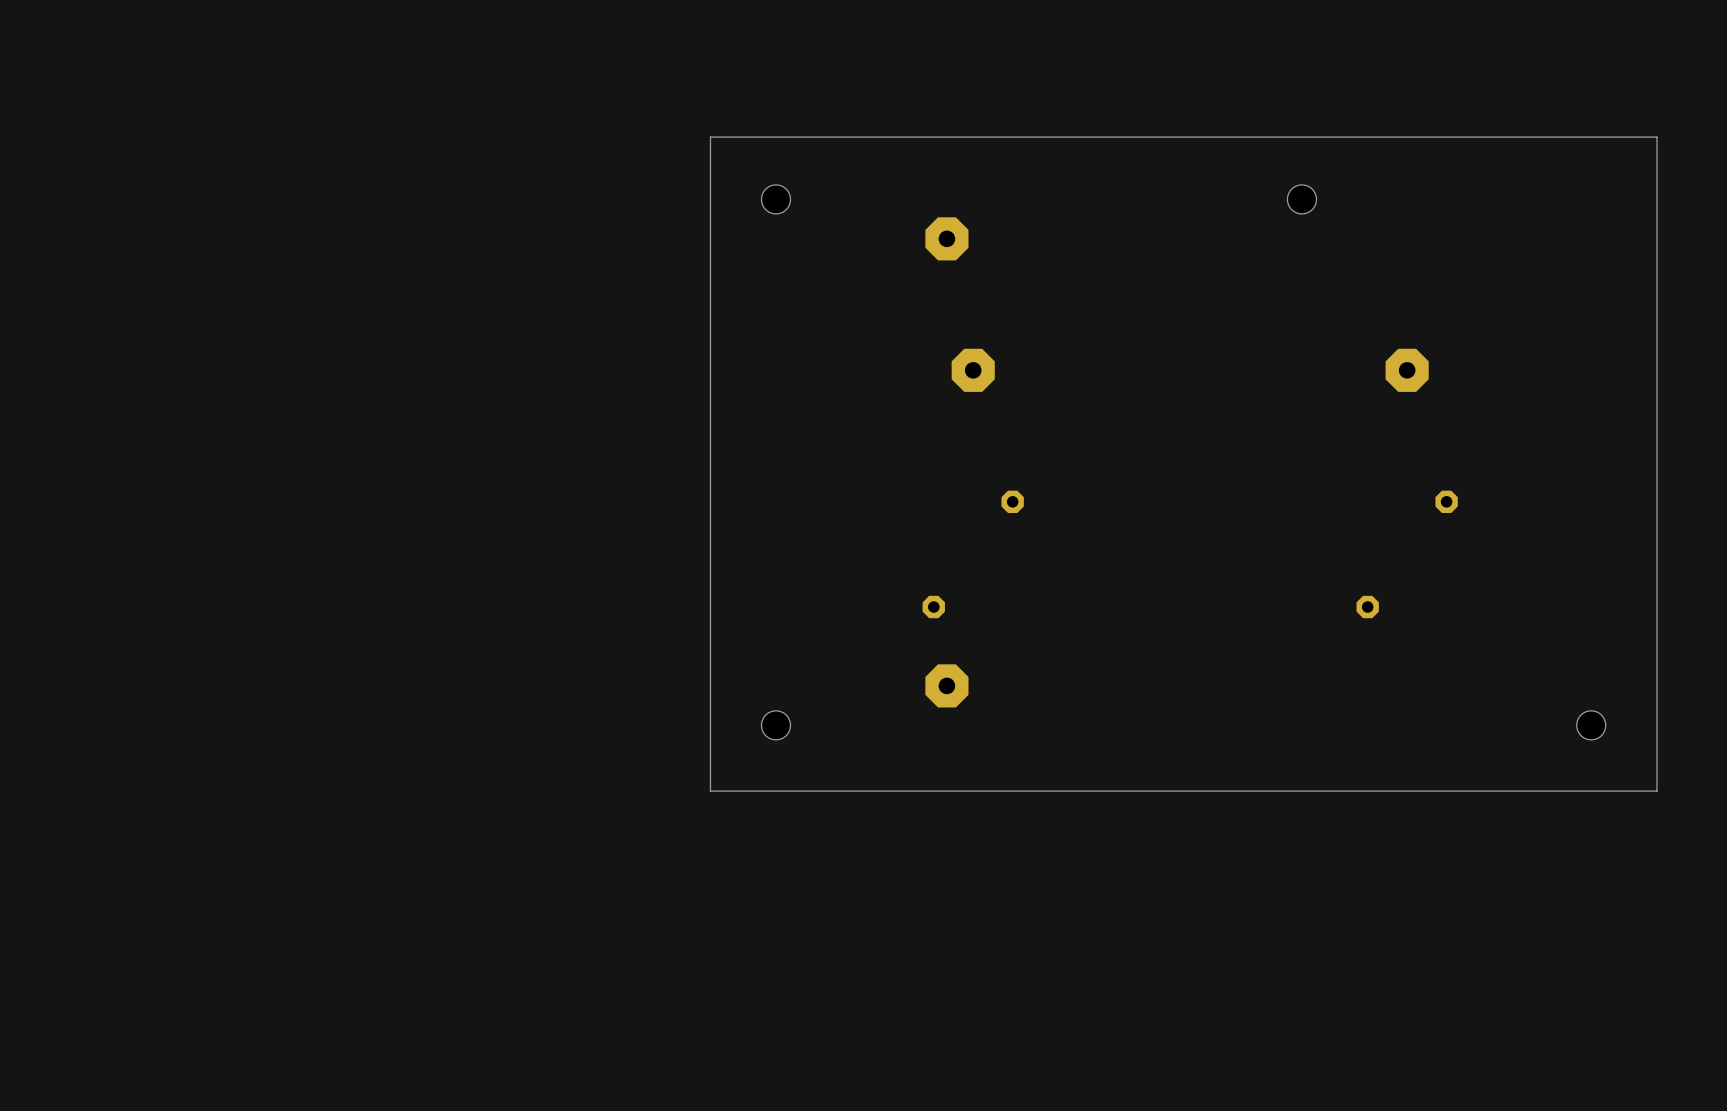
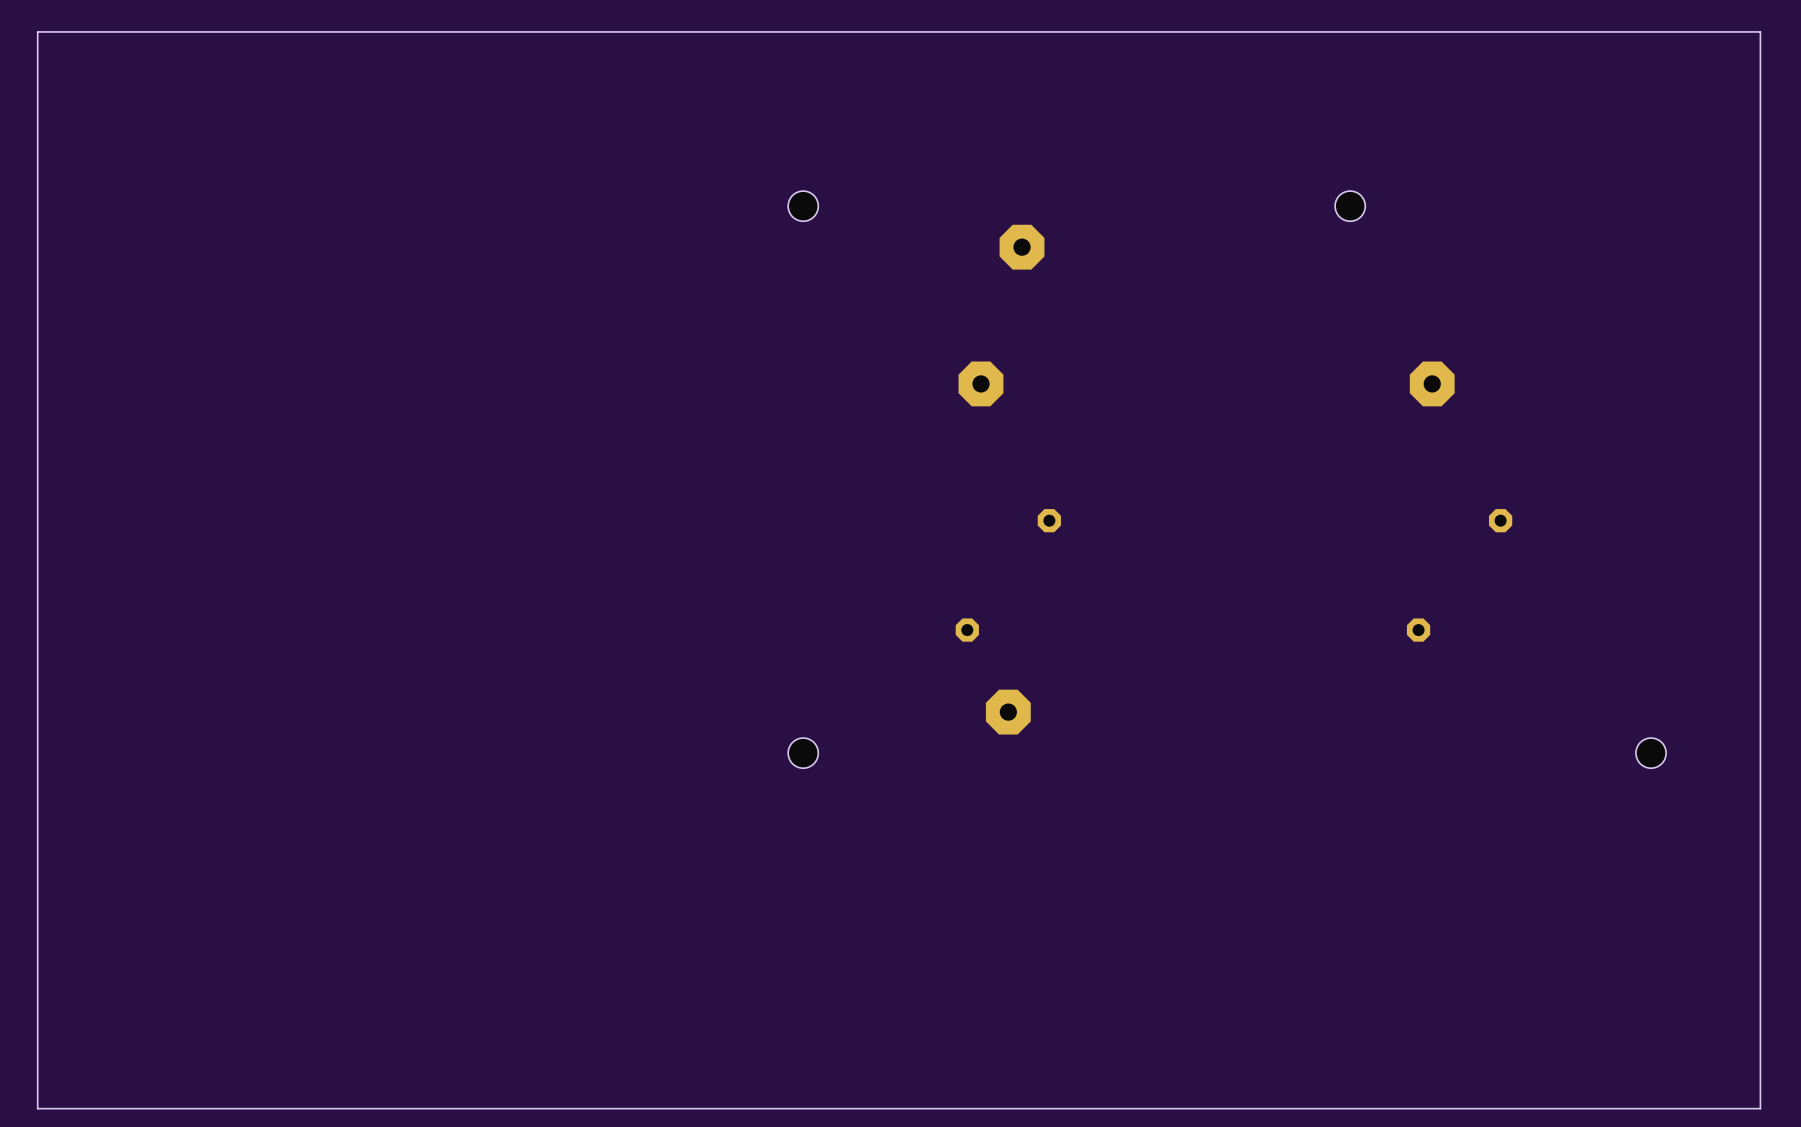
board edge: none -> (1760, 31) (37, 31) (37, 1108) (1760, 1108) (1760, 31)
board edge: (1656, 137) (710, 137) (710, 791) (1656, 791) (1656, 137) -> none
part position: (946, 238) -> (1022, 247)
part position: (973, 370) -> (980, 383)
part position: (1407, 370) -> (1432, 383)
part position: (946, 685) -> (1008, 712)

